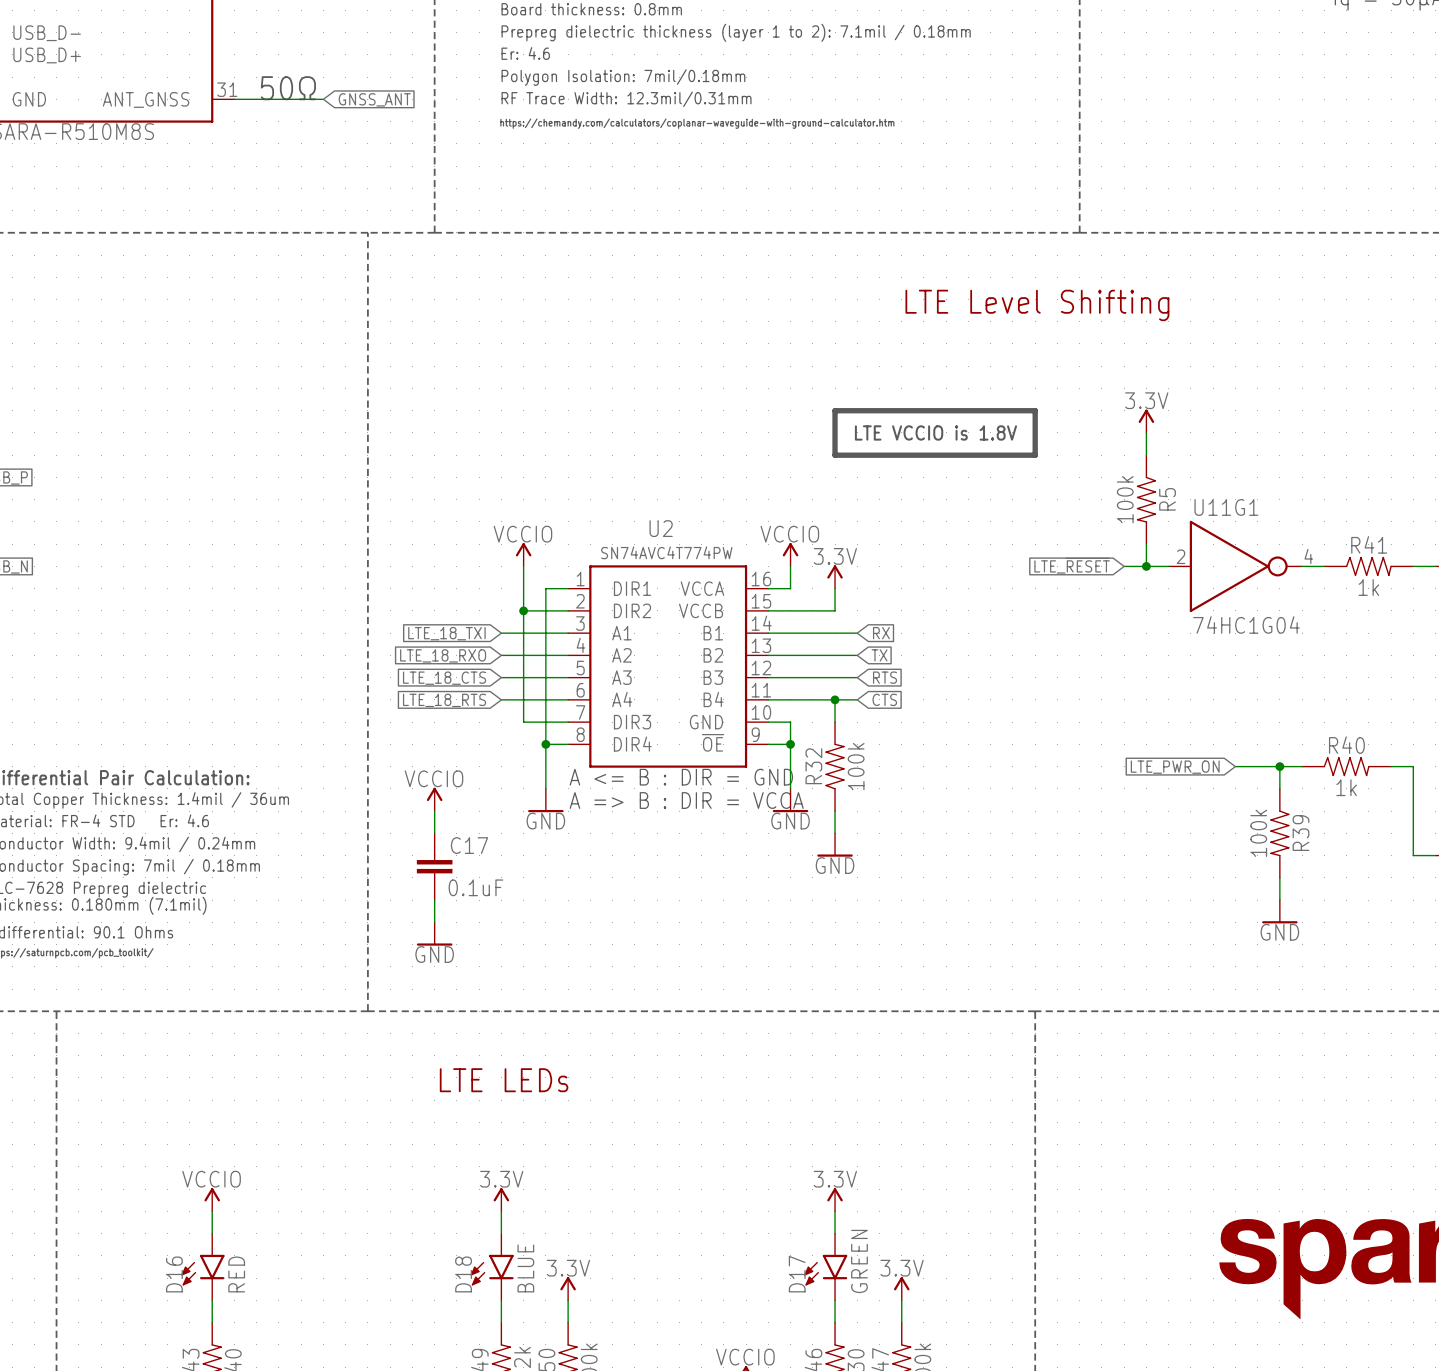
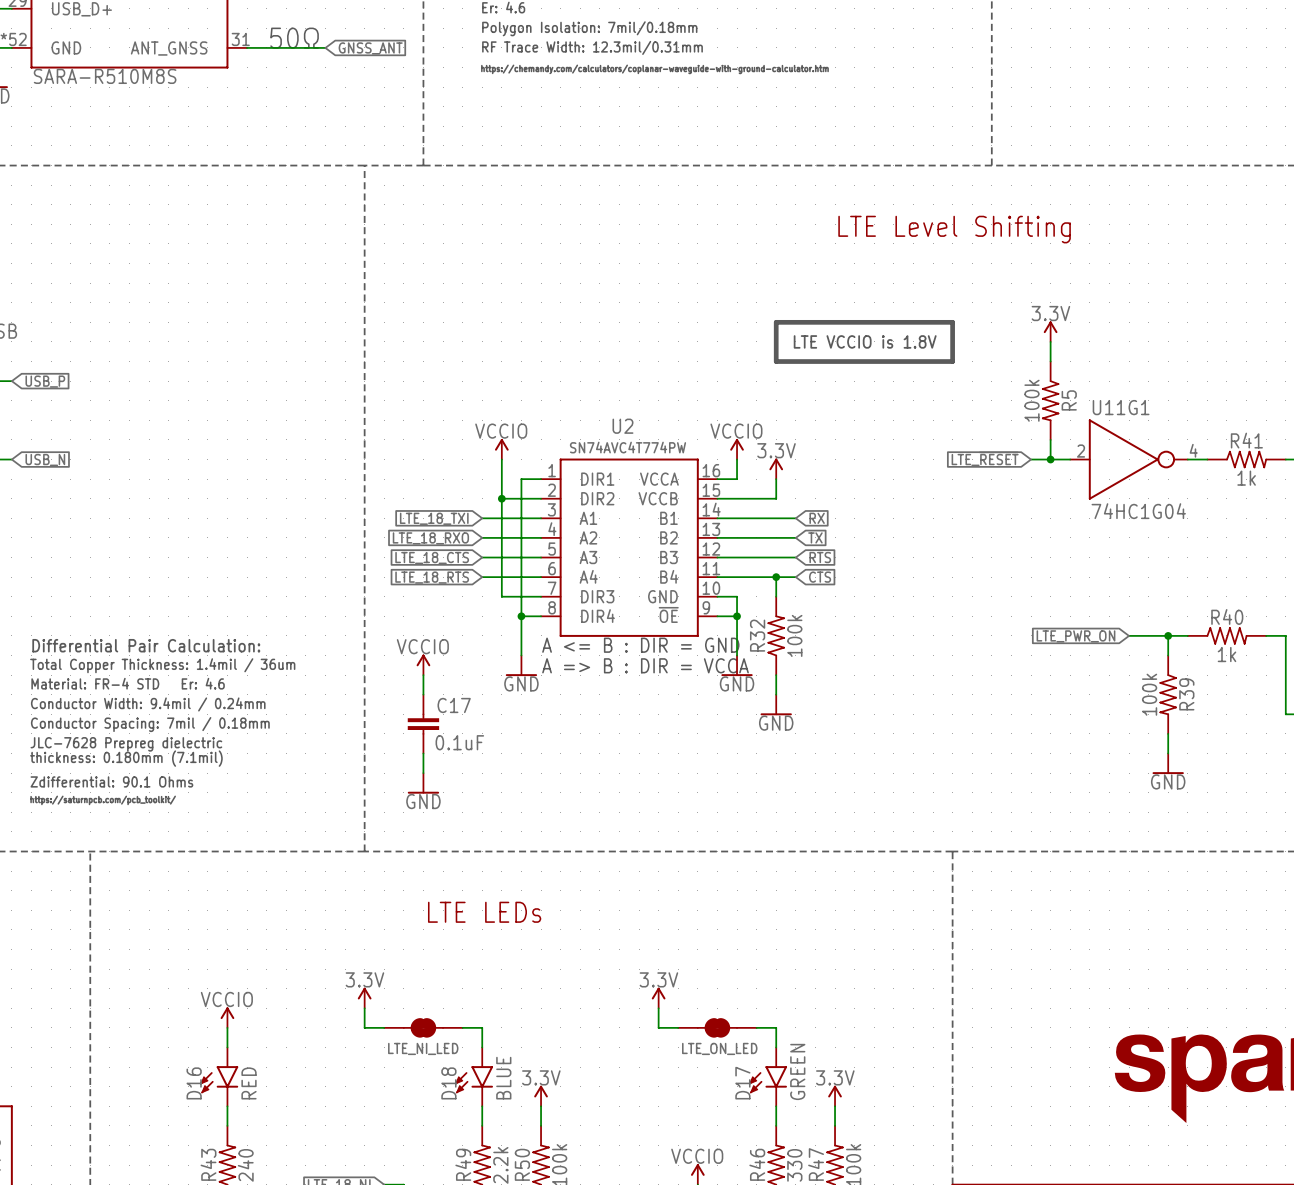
power symbol: none -> 3.3V (364, 998)
power symbol: none -> 3.3V (658, 998)
wire: none -> (364, 1008) (364, 1027) (384, 1027)
wire: none -> (658, 1008) (658, 1027) (678, 1027)
power symbol: 3.3V (501, 1199) -> none
power symbol: 3.3V (835, 1199) -> none
LTE_NI_LED: none -> (423, 1027)
wire: none -> (462, 1027) (482, 1027)
LTE_ON_LED: none -> (717, 1027)
wire: none -> (756, 1027) (776, 1027)

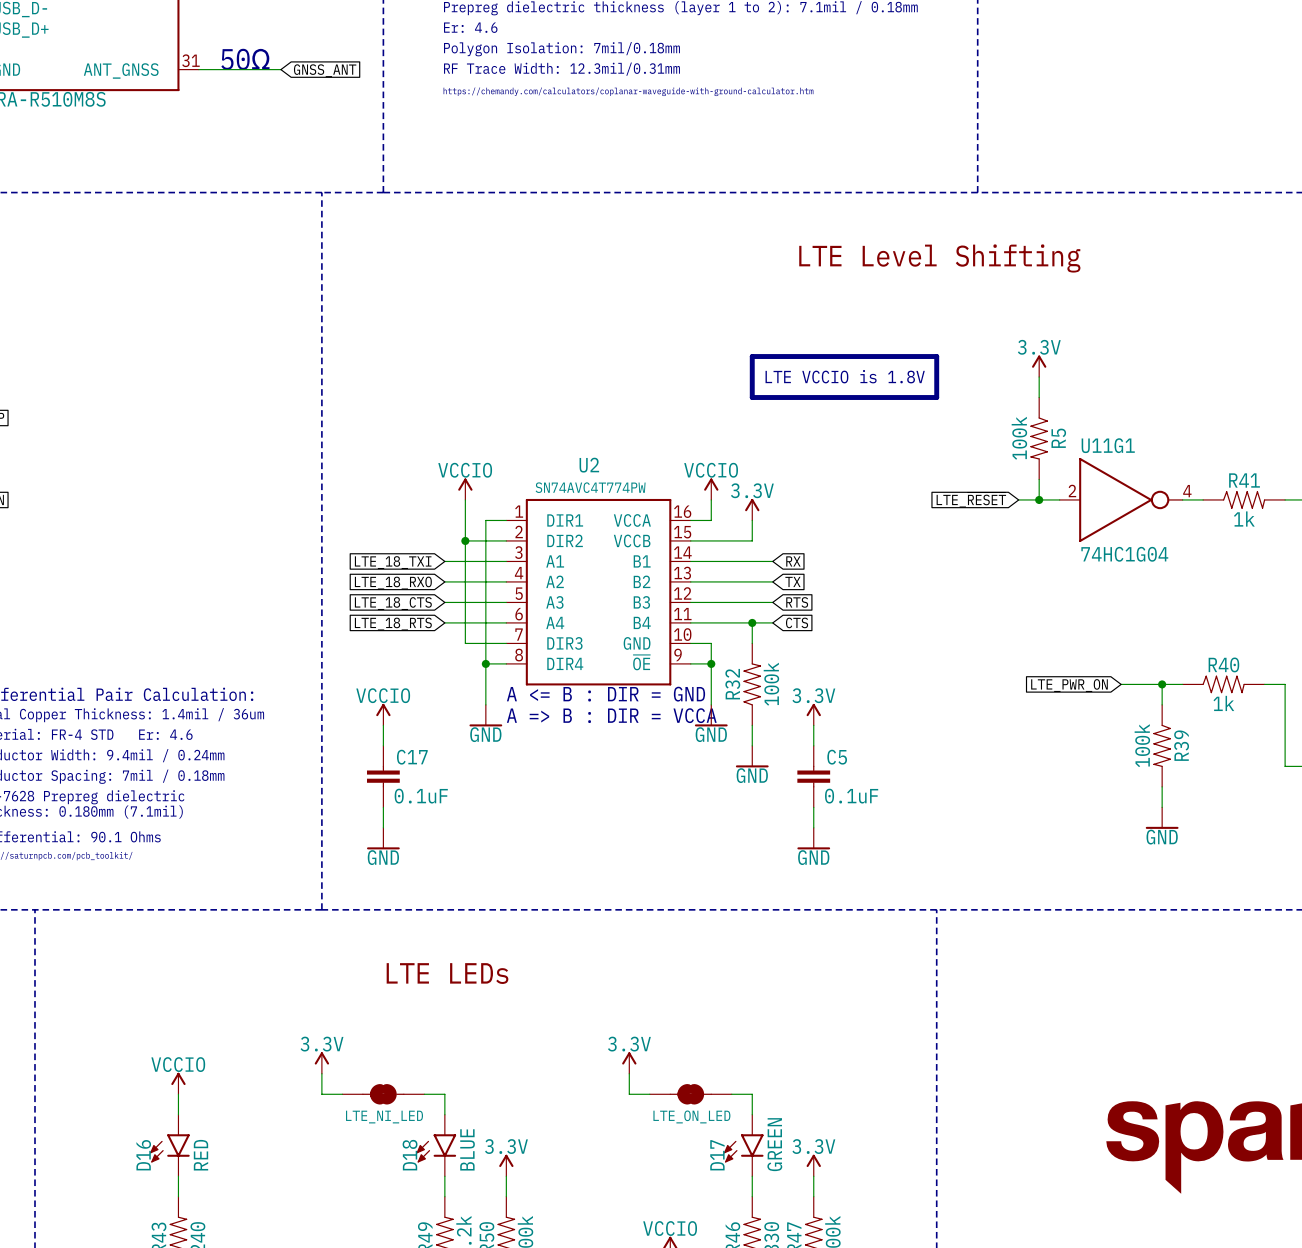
power symbol: none -> 3.3V (813, 714)
wire: none -> (813, 725) (813, 745)
C5: none -> 0.1uF (813, 776)
wire: none -> (813, 807) (813, 827)
power symbol: none -> GND (813, 838)

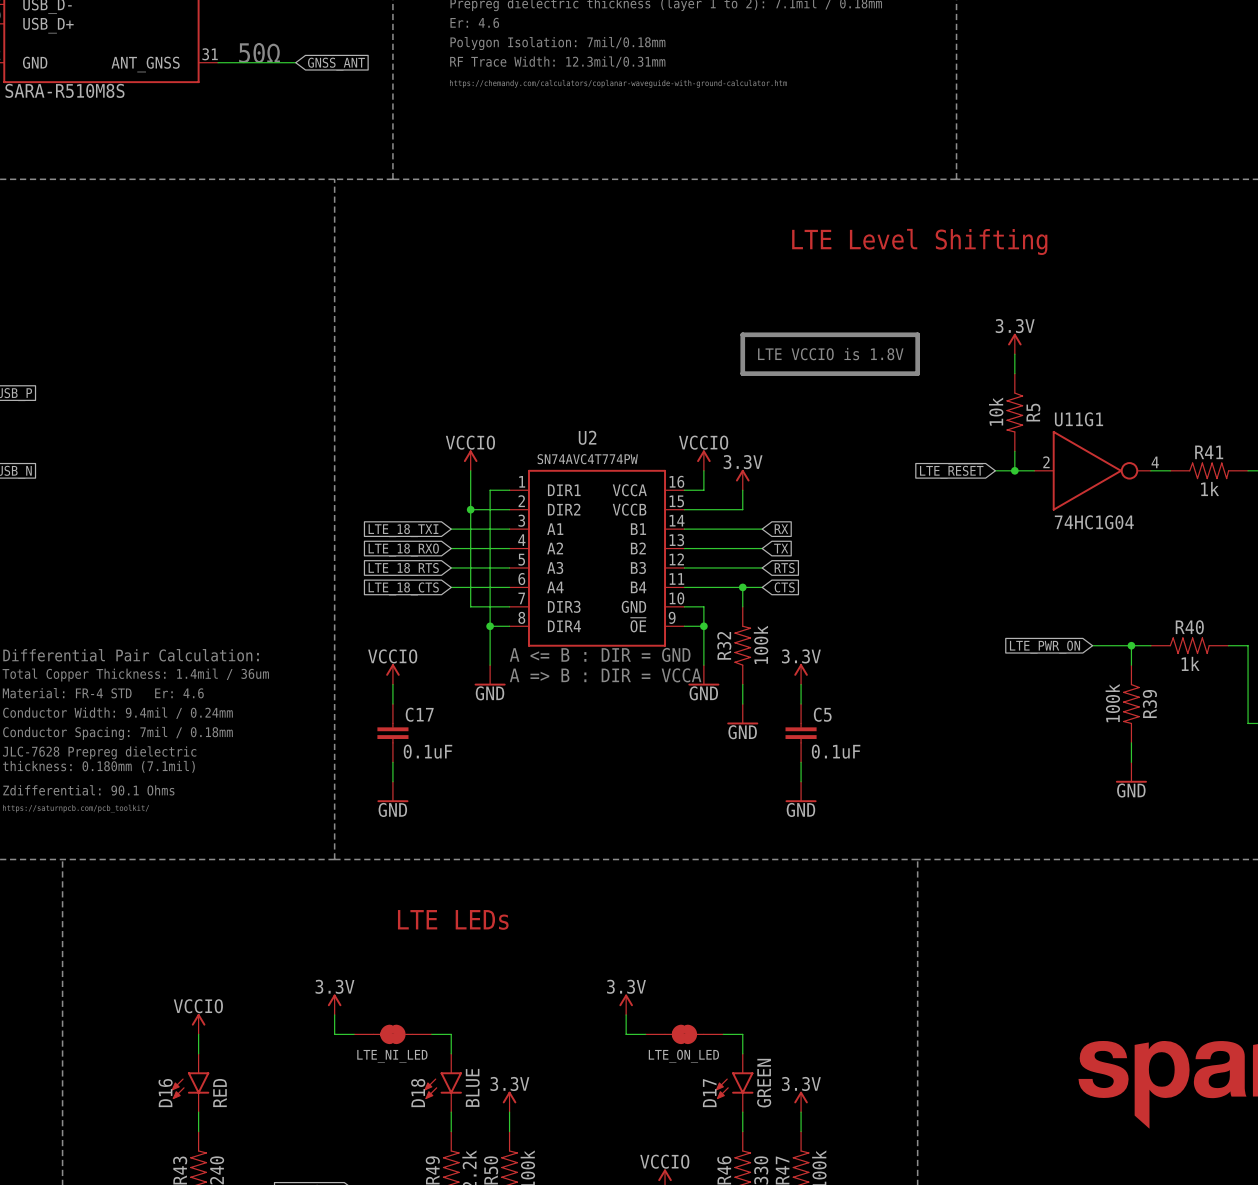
R5 value: 100k (1019, 438) -> 10k (996, 411)
global label: LTE_18_CTS (393, 603) -> LTE_18_RTS (403, 569)
global label: LTE_18_RTS (393, 624) -> LTE_18_CTS (403, 588)

